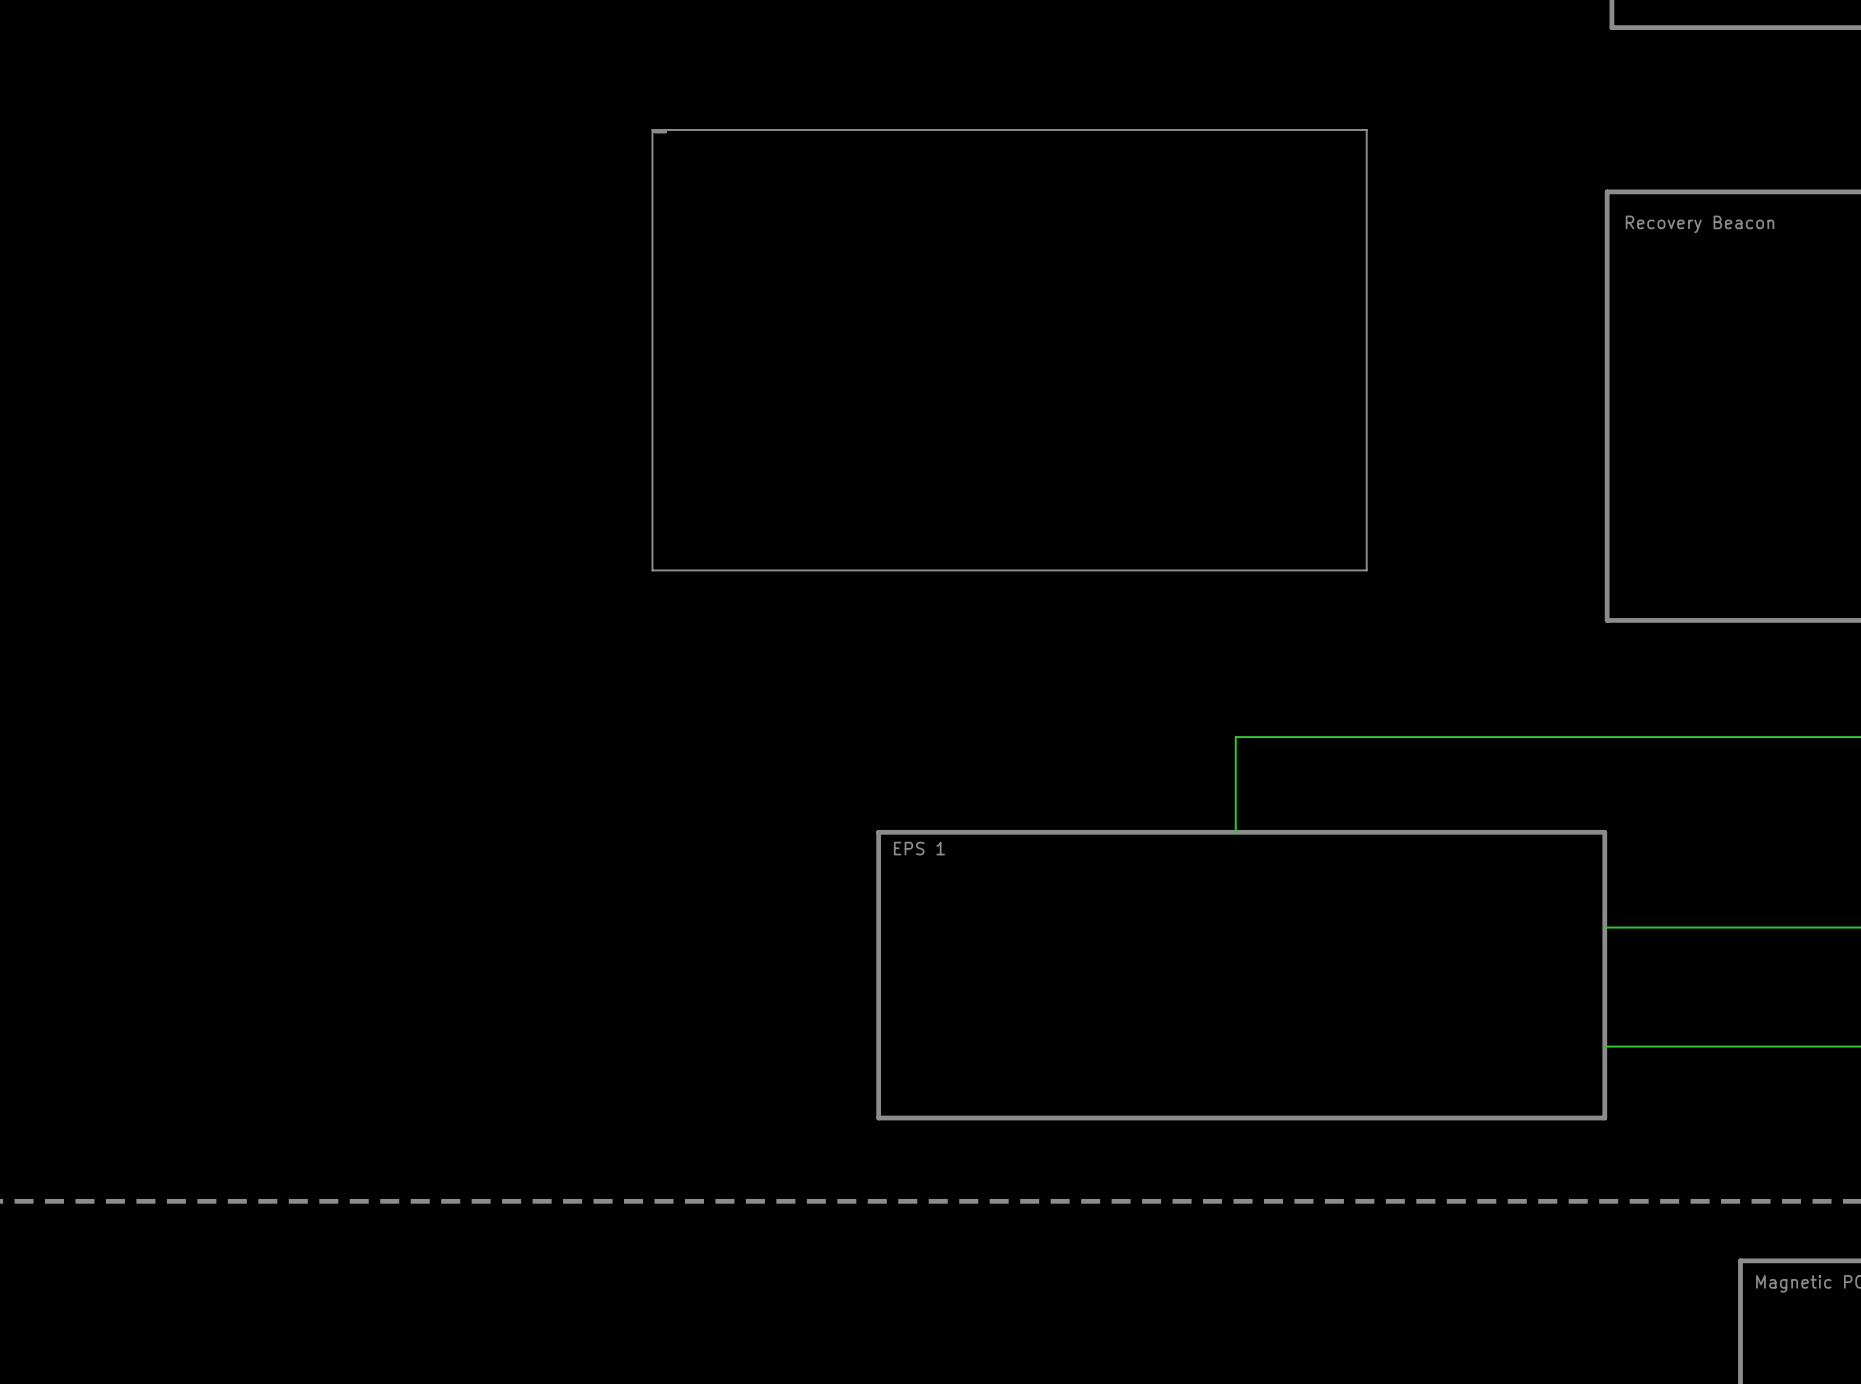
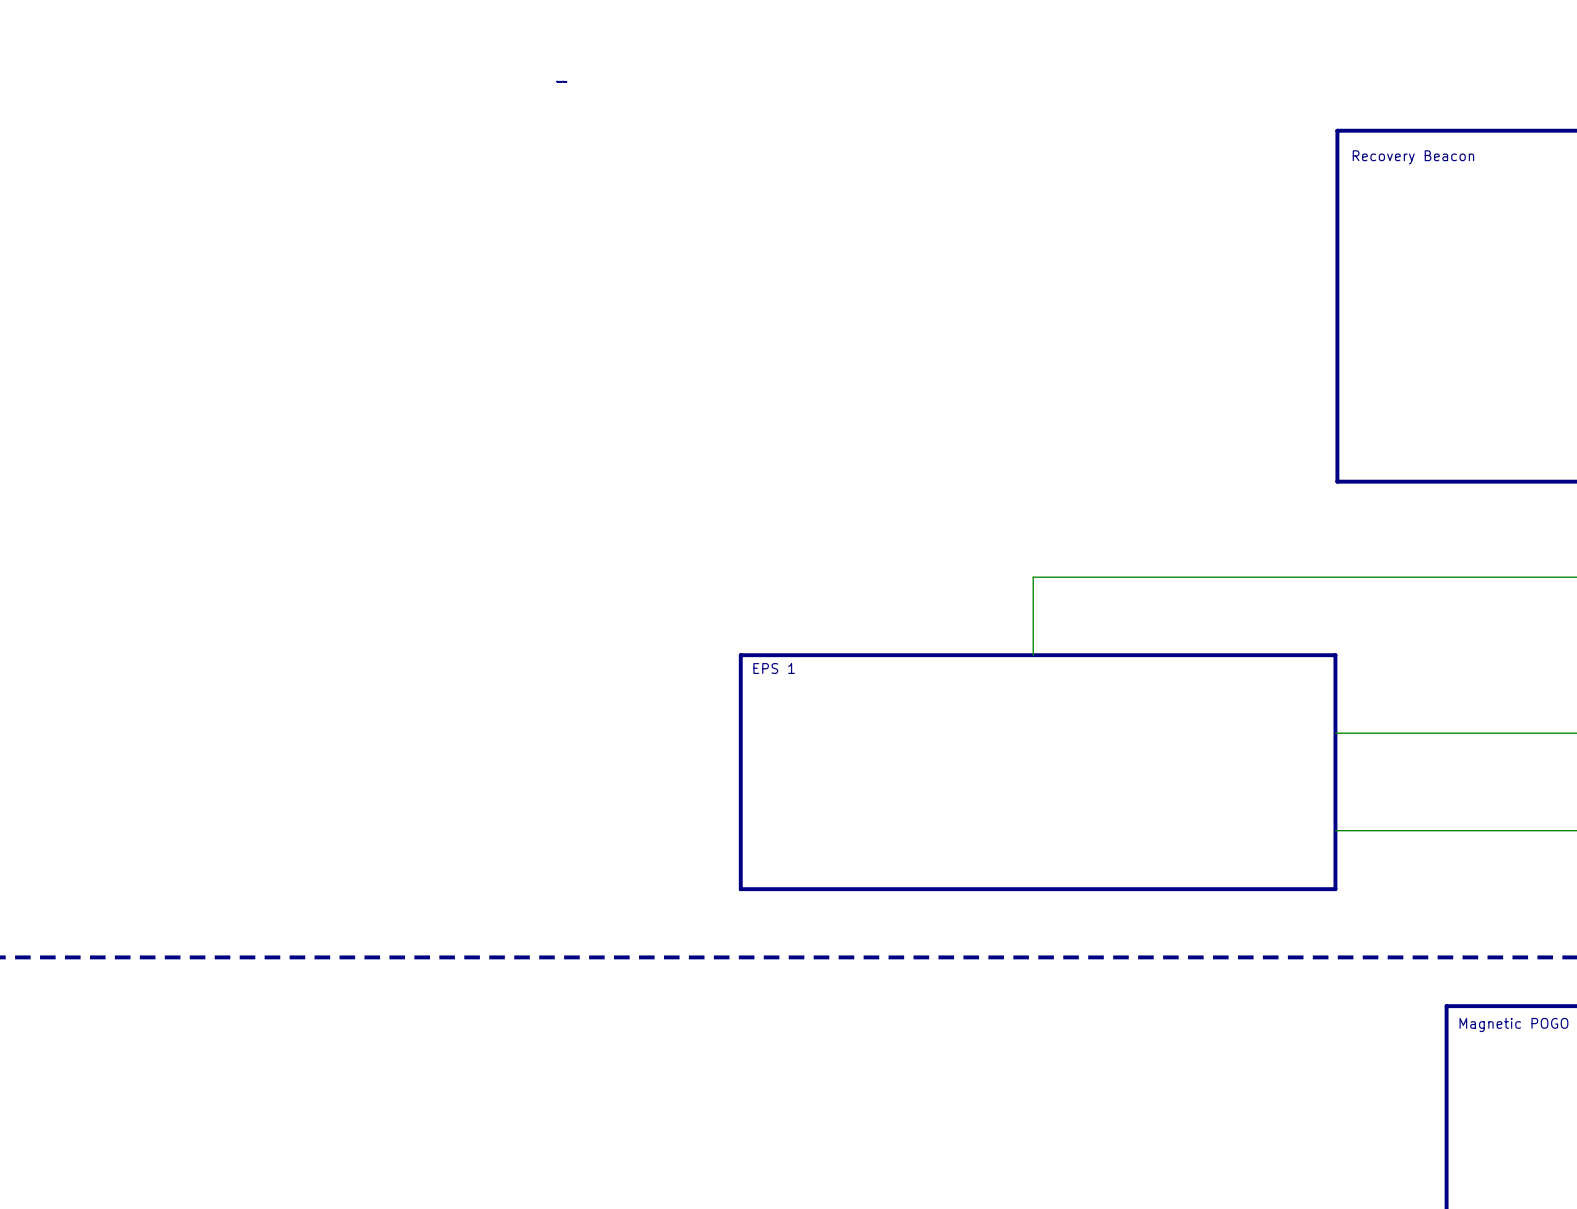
line: (652, 129) (1366, 129) (1366, 570) (652, 570) (652, 129) -> none

